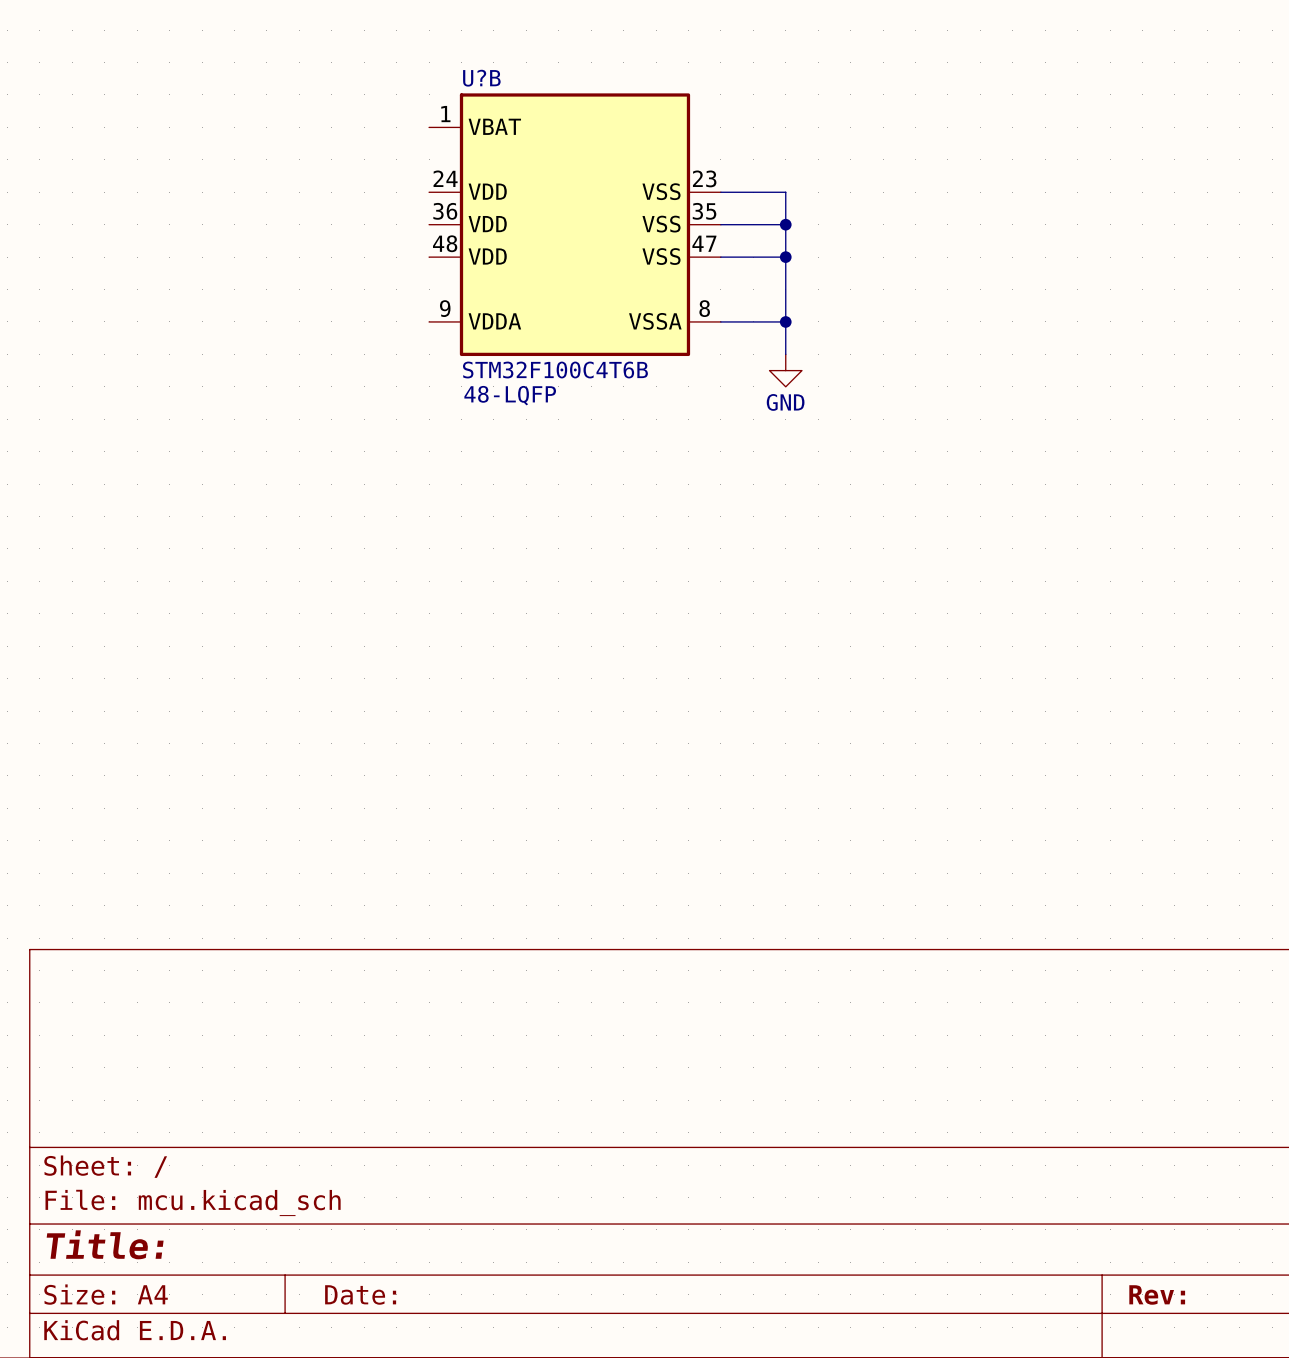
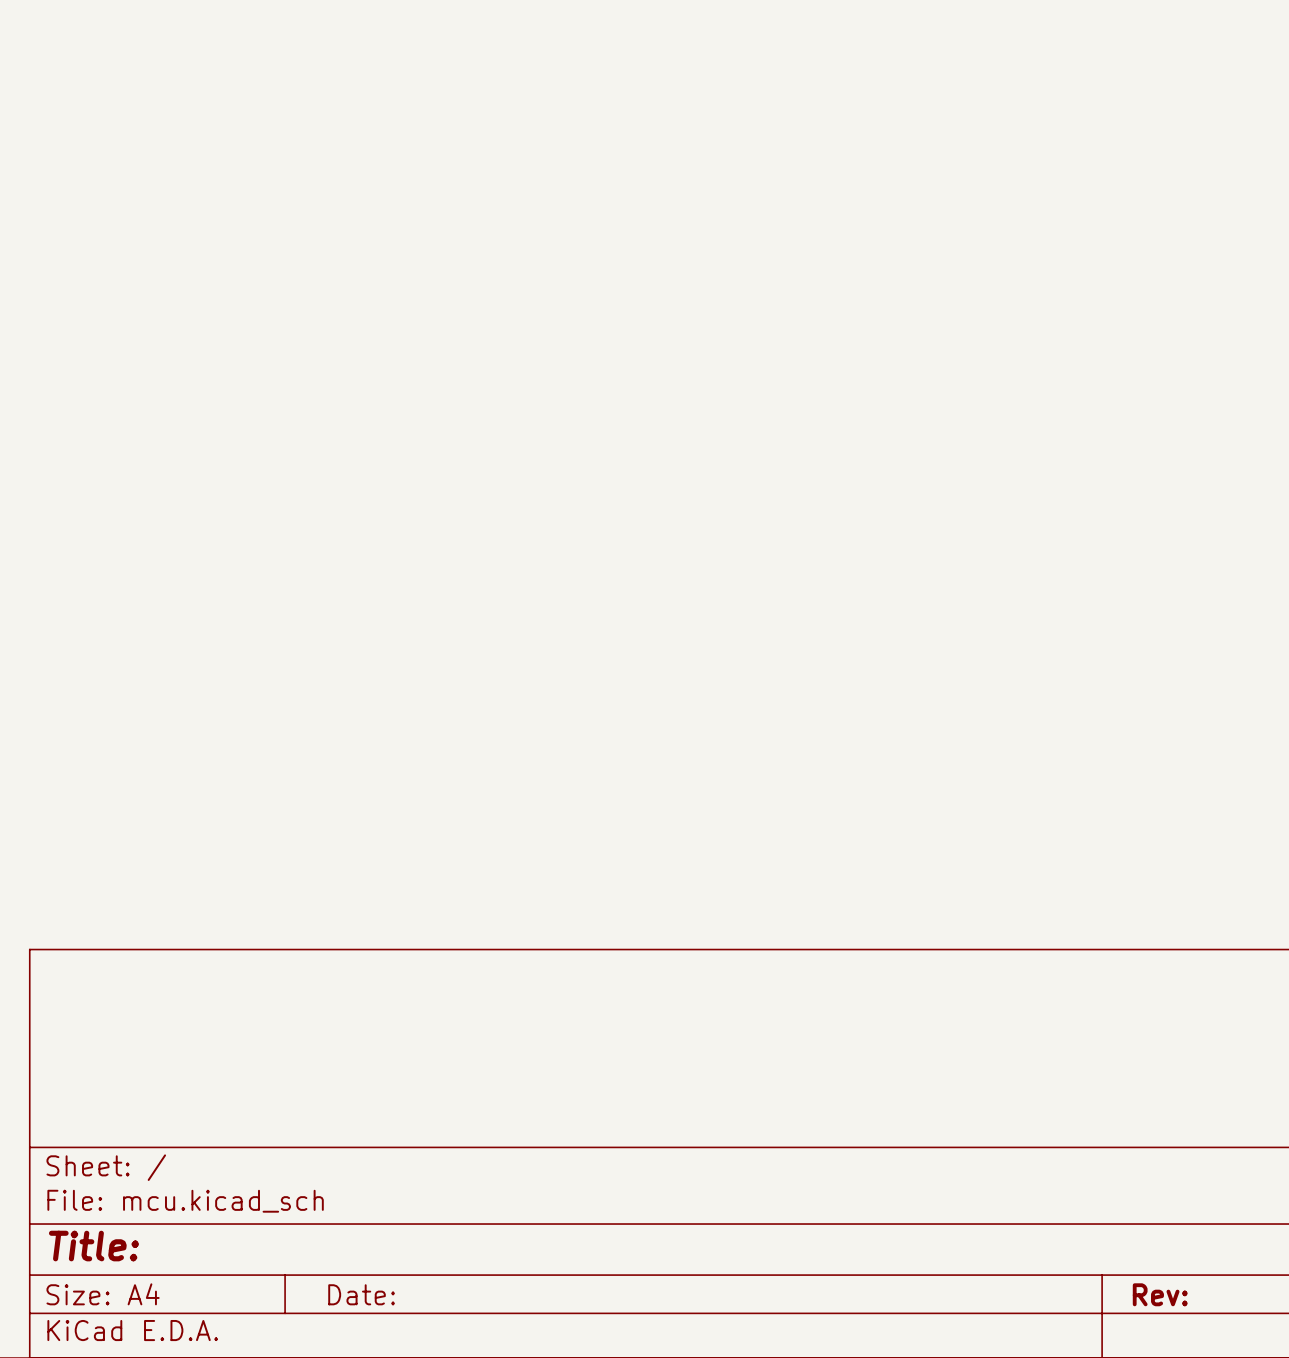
wire: (720, 192) (785, 192) (785, 354) -> none
U?B: (574, 224) -> none
wire: (720, 224) (785, 224) -> none
junction: (785, 224) -> none
wire: (720, 257) (785, 257) -> none
junction: (785, 257) -> none
wire: (720, 321) (785, 321) -> none
junction: (785, 321) -> none
power symbol: GND (785, 370) -> none

